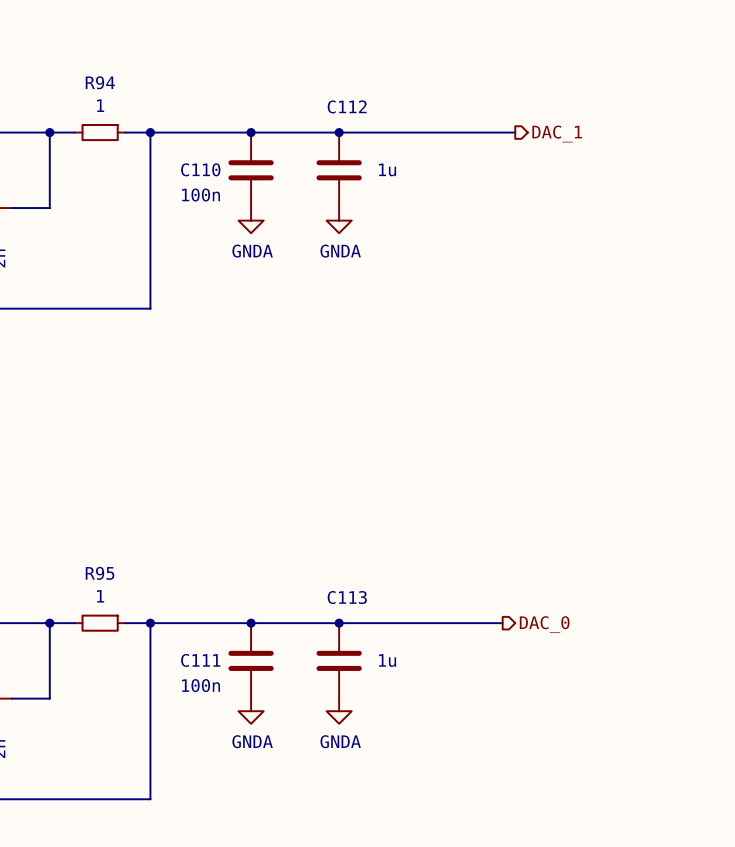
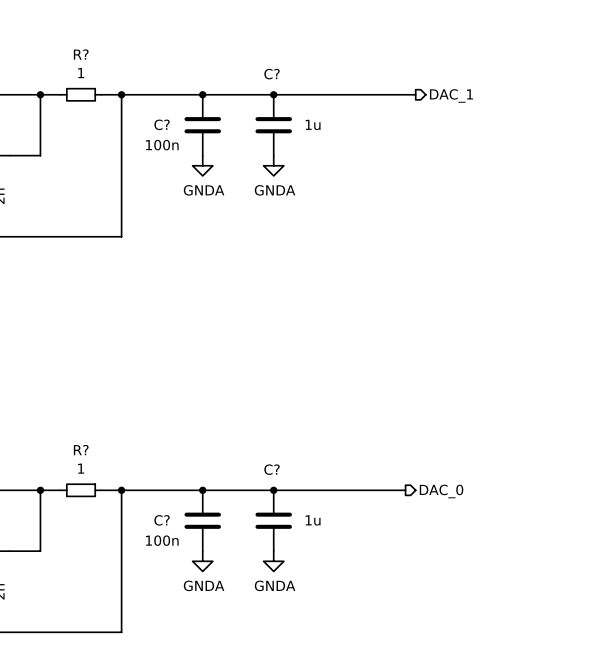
R94 name: R94 (100, 82) -> R? (81, 54)
C112 name: C112 (347, 106) -> C? (272, 74)
C110 name: C110 (200, 169) -> C? (162, 124)
R95 name: R95 (100, 573) -> R? (81, 450)
C113 name: C113 (347, 597) -> C? (272, 469)
C111 name: C111 (200, 660) -> C? (162, 520)

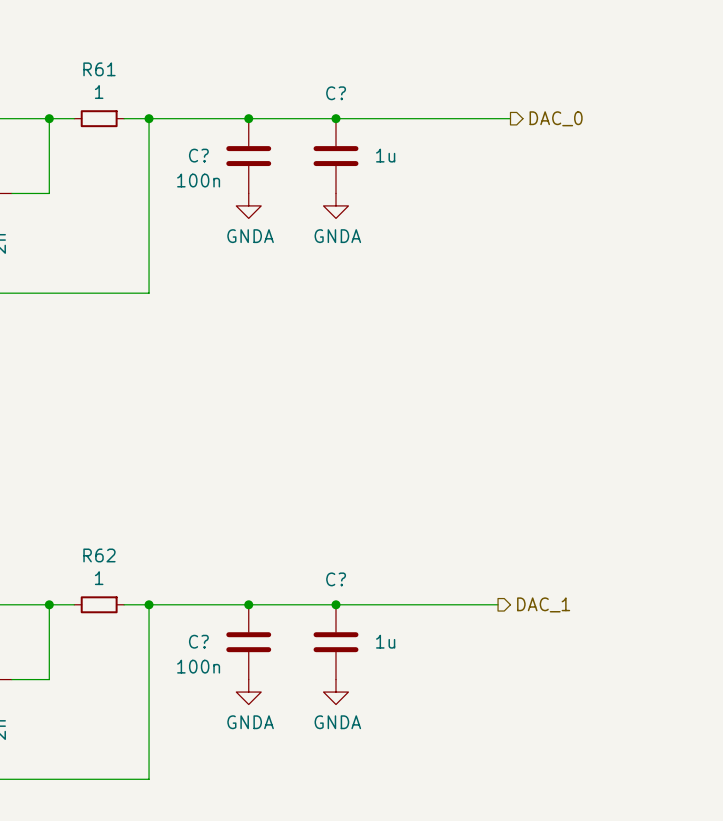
R? name: R? (81, 54) -> R61 (99, 69)
hierarchical label: DAC_1 (451, 95) -> DAC_0 (556, 118)
R? name: R? (81, 450) -> R62 (99, 555)
hierarchical label: DAC_0 (441, 491) -> DAC_1 (543, 604)

